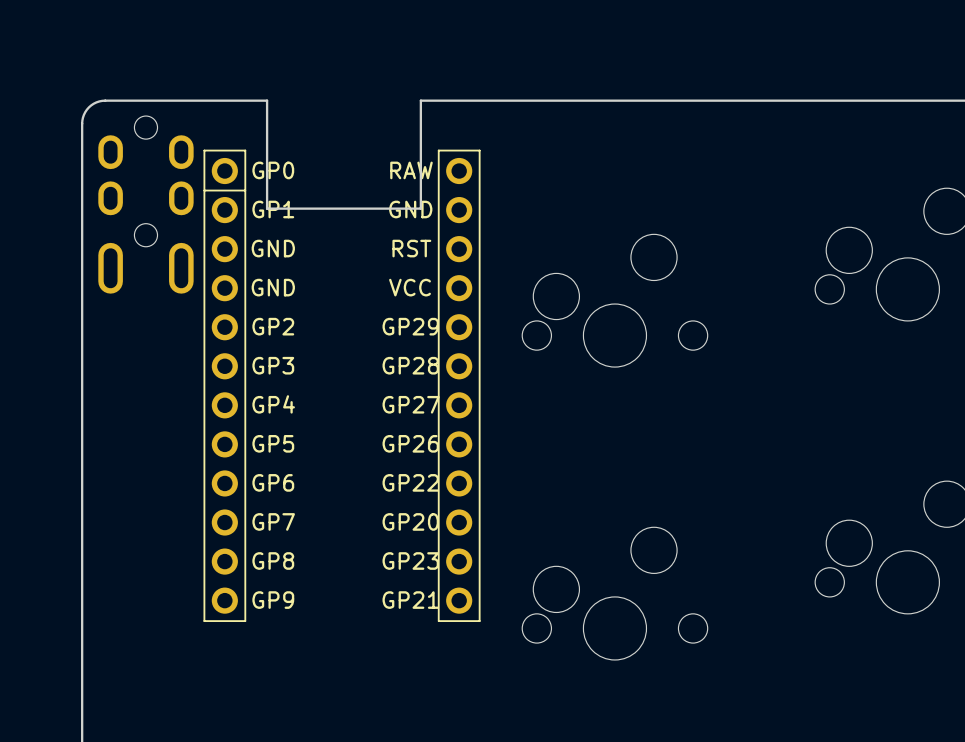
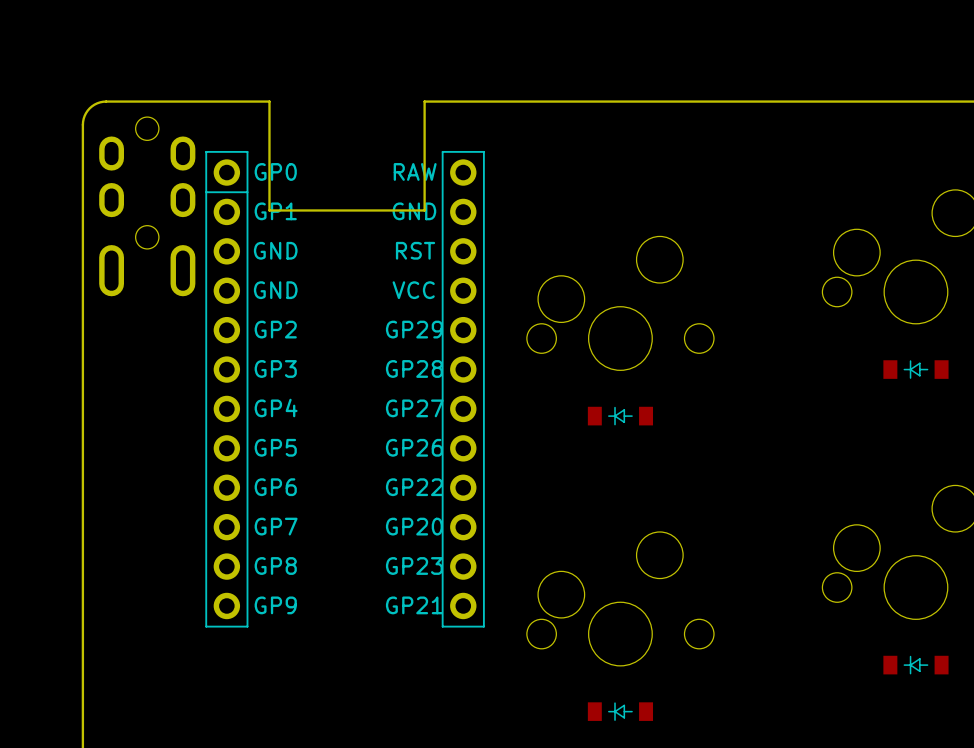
part: none -> (915, 369)
part: none -> (620, 416)
part: none -> (915, 665)
part: none -> (620, 711)

